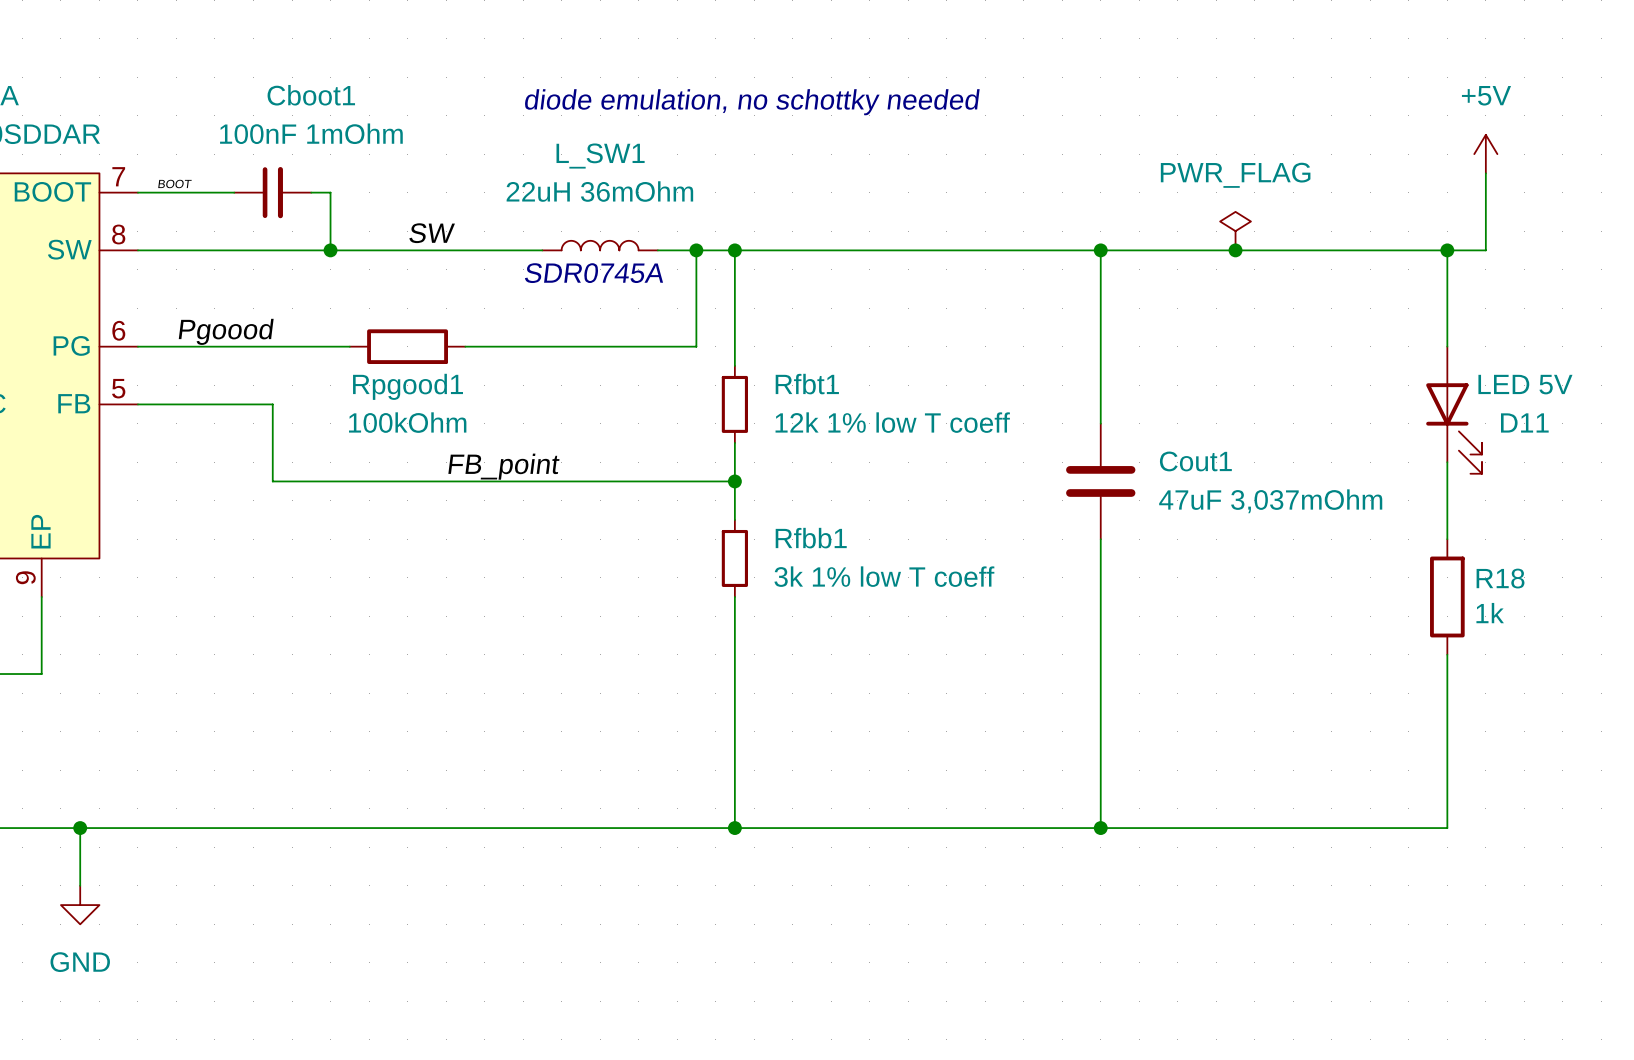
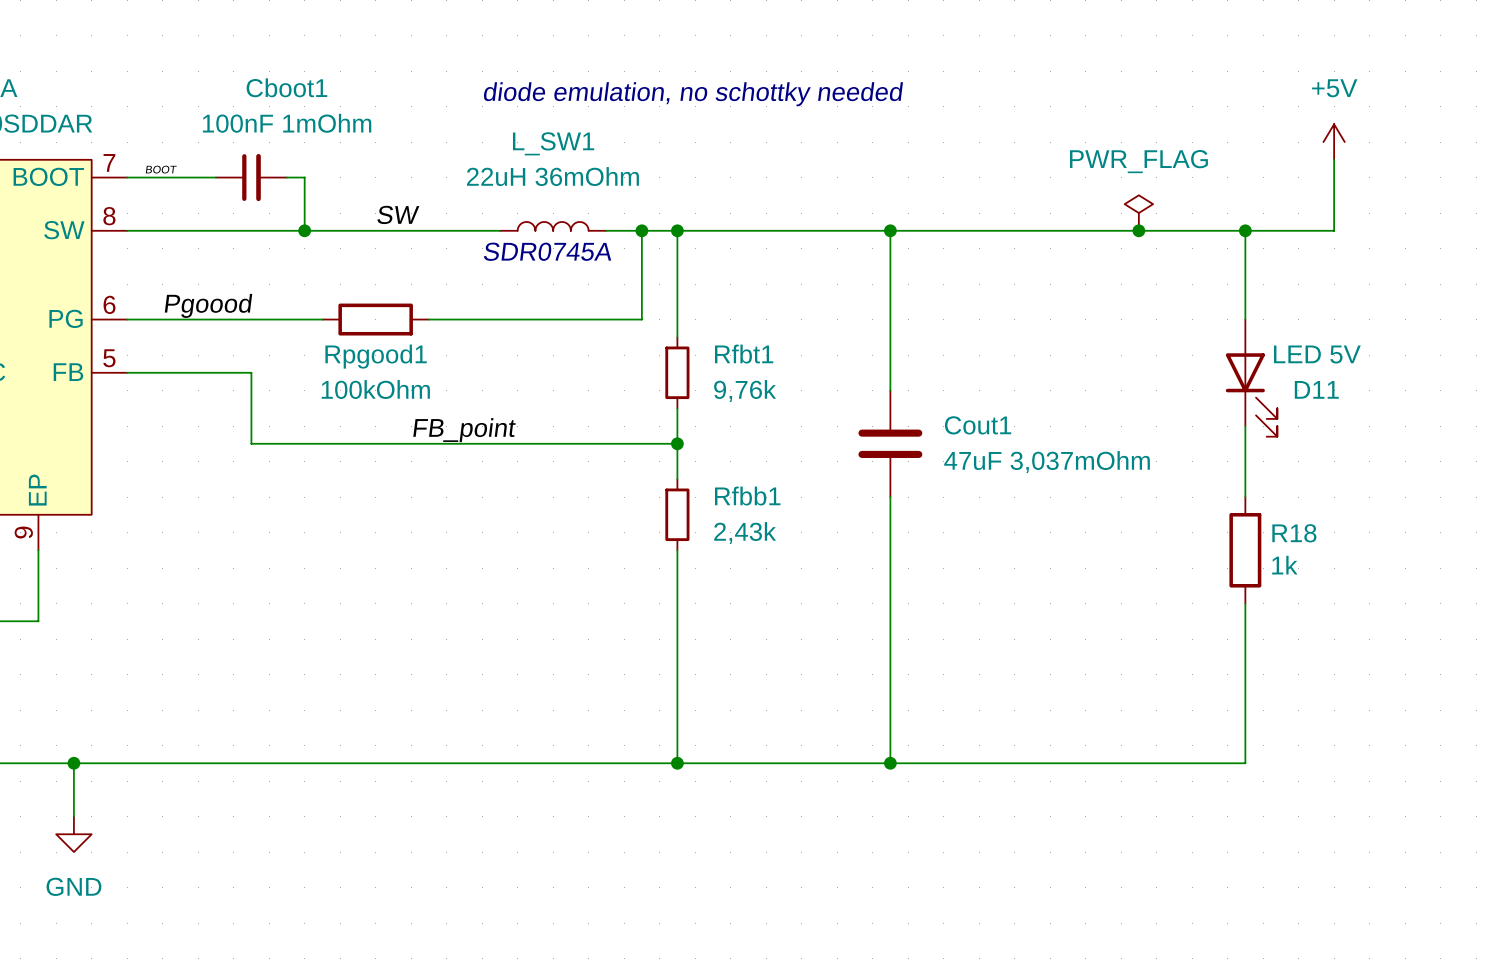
power symbol position: +5V (1485, 154) -> +5V (1334, 142)
wire: none -> (1334, 159) (1334, 230)
wire: (1485, 173) (1485, 250) (1447, 250) (1447, 346) -> none
junction: none -> (890, 230)
wire: (1100, 250) (1100, 423) -> (890, 230) (890, 390)
junction: (1100, 250) -> none
wire: none -> (1245, 230) (1245, 319)
junction: none -> (1245, 230)
junction: (1447, 250) -> none
D11 position: (1454, 410) -> (1251, 378)
Rfbt1 value: 12k 1% low T coeff (892, 422) -> 9,76k (745, 391)
wire: (1447, 462) (1447, 539) -> (1245, 426) (1245, 497)
Cout1 position: (1100, 481) -> (890, 443)
wire: (1100, 539) (1100, 828) -> (890, 497) (890, 763)
Rfbb1 value: 3k 1% low T coeff (884, 576) -> 2,43k (745, 533)
R18 position: (1447, 596) -> (1245, 550)
wire: (1447, 654) (1447, 828) (1351, 828) -> (1245, 603) (1245, 763)
junction: none -> (890, 763)
junction: (1100, 828) -> none

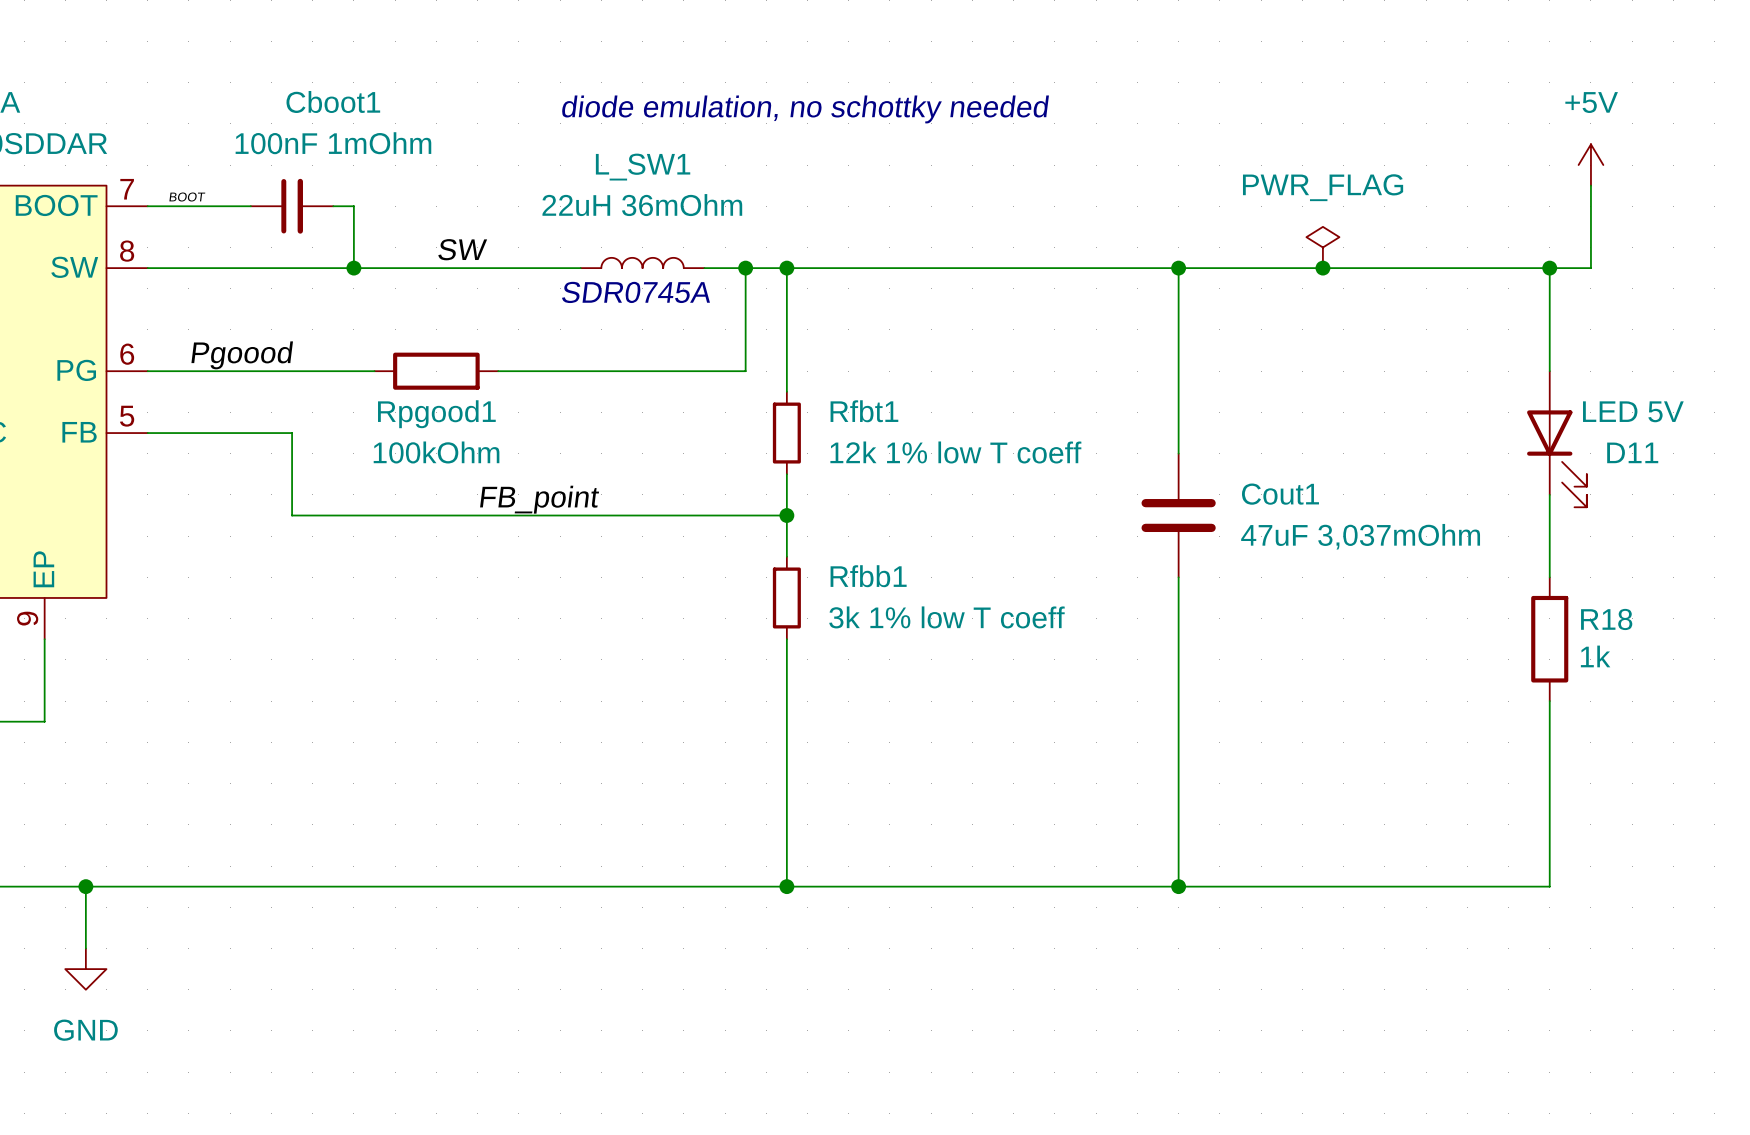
power symbol position: +5V (1334, 142) -> +5V (1590, 165)
wire: (1334, 159) (1334, 230) -> none
wire: none -> (1590, 185) (1590, 268) (1549, 268) (1549, 371)
wire: (890, 230) (890, 390) -> (1178, 268) (1178, 453)
junction: (890, 230) -> none
junction: none -> (1178, 268)
wire: (1245, 230) (1245, 319) -> none
junction: (1245, 230) -> none
junction: none -> (1549, 268)
D11 position: (1251, 378) -> (1556, 439)
Rfbt1 value: 9,76k (745, 391) -> 12k 1% low T coeff (955, 452)
wire: (1245, 426) (1245, 497) -> (1549, 494) (1549, 577)
Cout1 position: (890, 443) -> (1178, 515)
wire: (890, 497) (890, 763) -> (1178, 577) (1178, 886)
Rfbb1 value: 2,43k (745, 533) -> 3k 1% low T coeff (946, 617)
R18 position: (1245, 550) -> (1549, 639)
wire: (1245, 603) (1245, 763) -> (1549, 701) (1549, 886) (1446, 886)
junction: (890, 763) -> none
junction: none -> (1178, 886)

